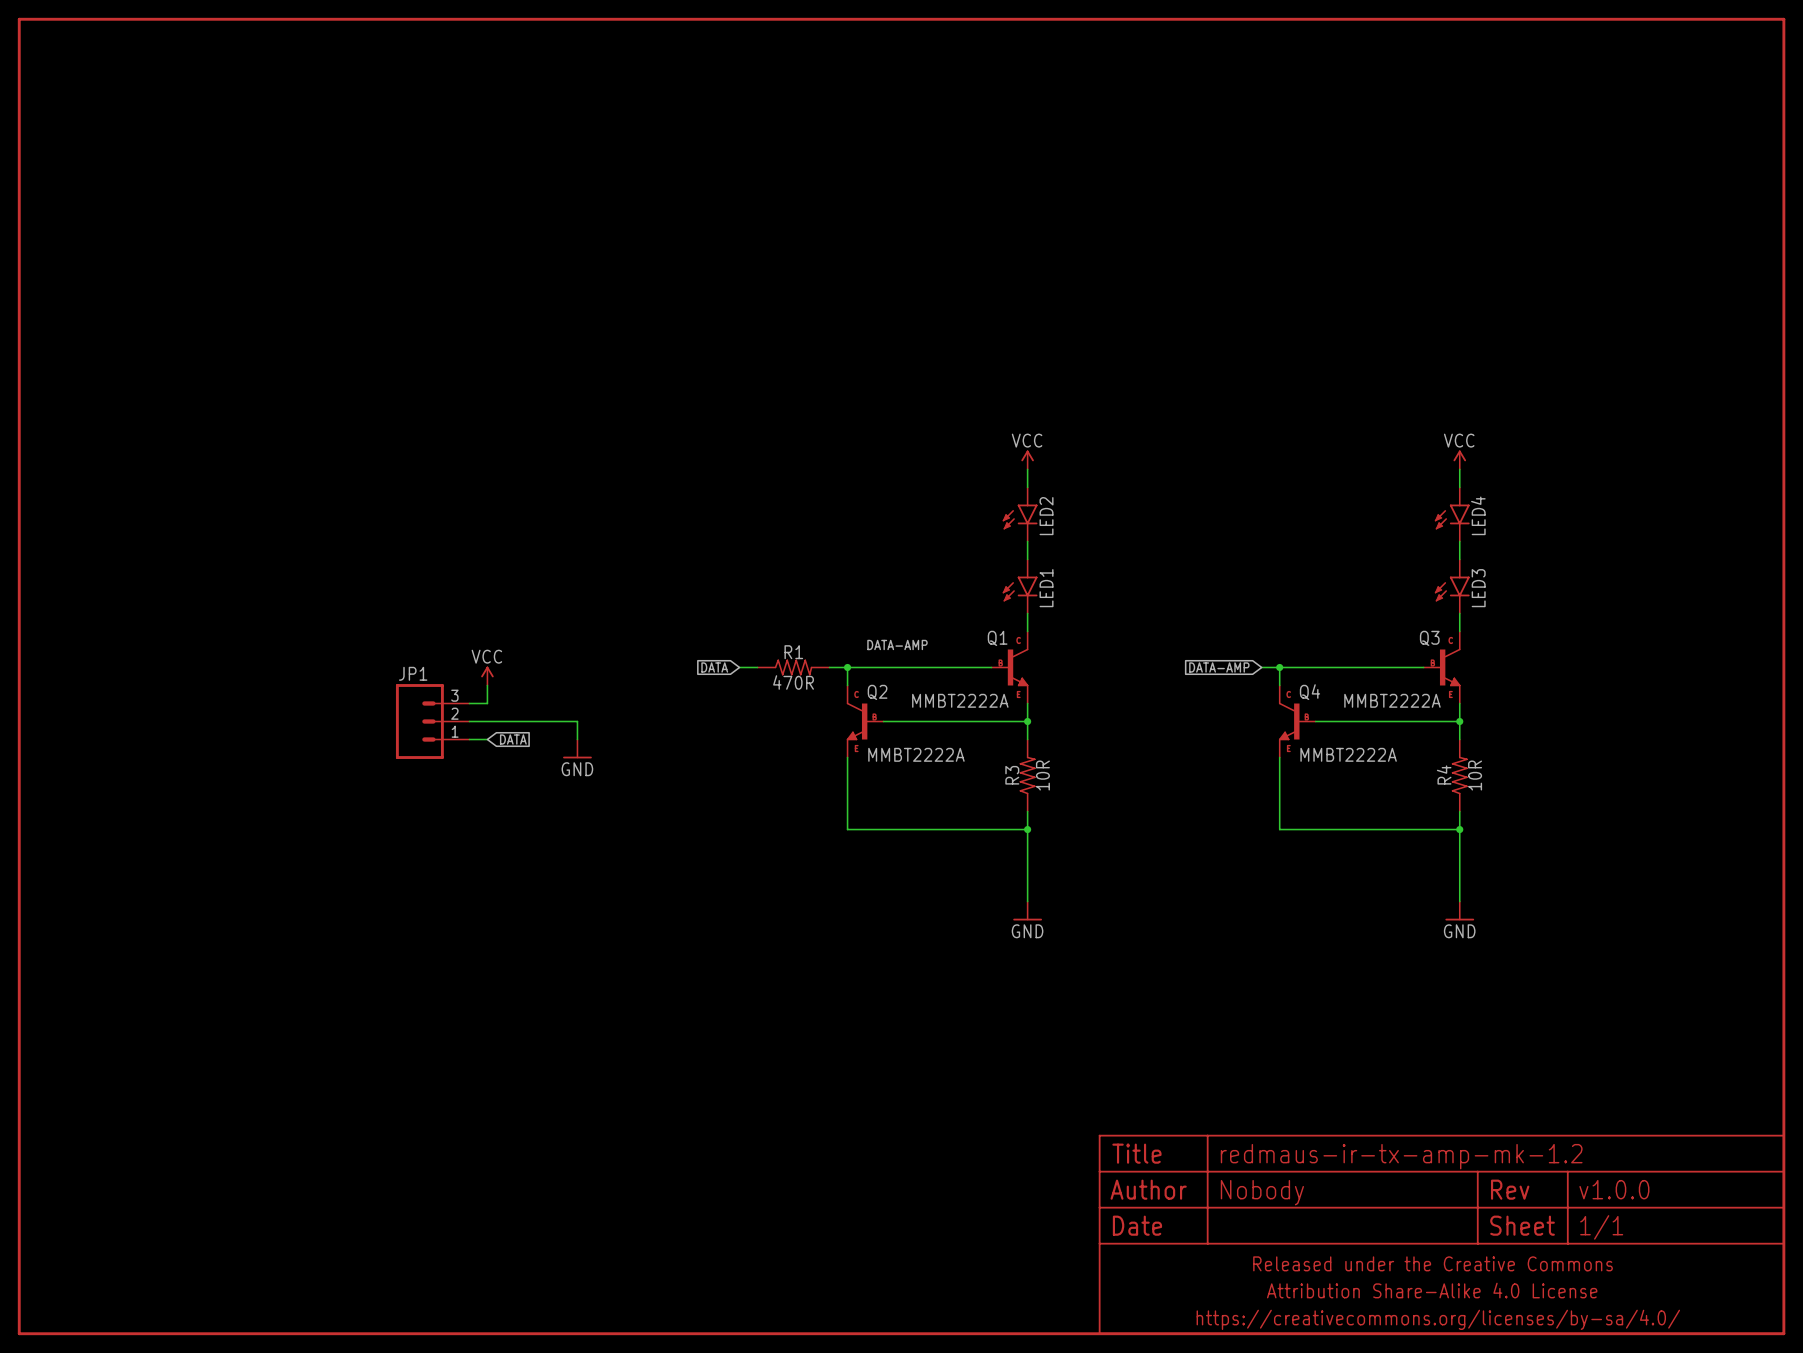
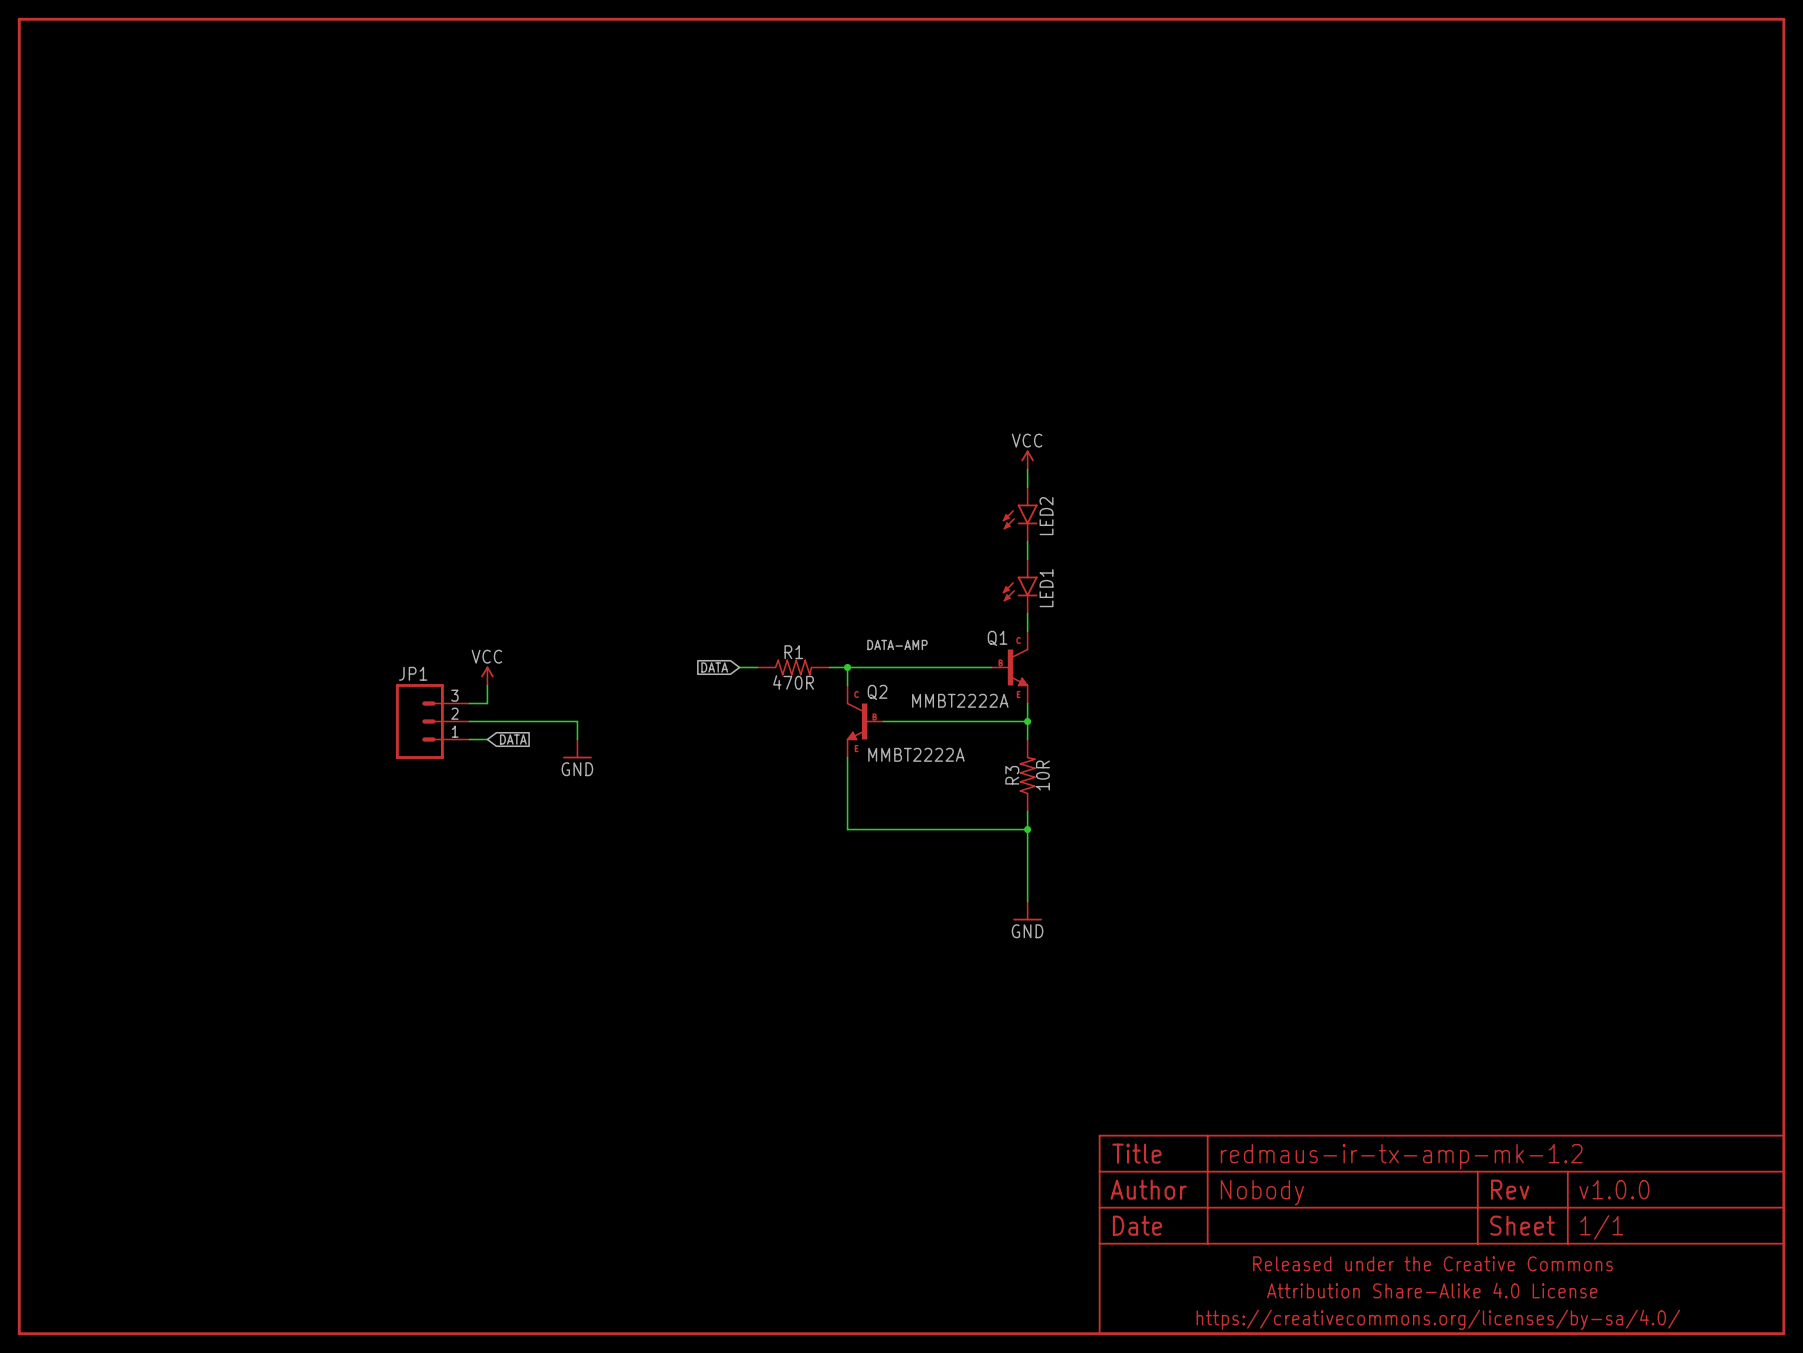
power symbol: VCC (1459, 459) -> none
wire: (1459, 469) (1459, 487) -> none
LED4: (1452, 514) -> none
wire: (1459, 541) (1459, 559) -> none
LED3: (1452, 586) -> none
wire: (1459, 613) (1459, 631) -> none
global label: DATA-AMP (1219, 667) -> none
wire: (1261, 667) (1423, 667) -> none
wire: (1279, 667) (1279, 685) -> none
junction: (1279, 667) -> none
Q3: MMBT2222A (1442, 667) -> none
wire: (1459, 703) (1459, 739) -> none
Q4: MMBT2222A (1297, 721) -> none
wire: (1315, 721) (1459, 721) -> none
junction: (1459, 721) -> none
wire: (1279, 757) (1279, 829) (1459, 829) -> none
R4: 10R (1459, 775) -> none
wire: (1459, 811) (1459, 901) -> none
junction: (1459, 829) -> none
power symbol: GND (1459, 911) -> none

